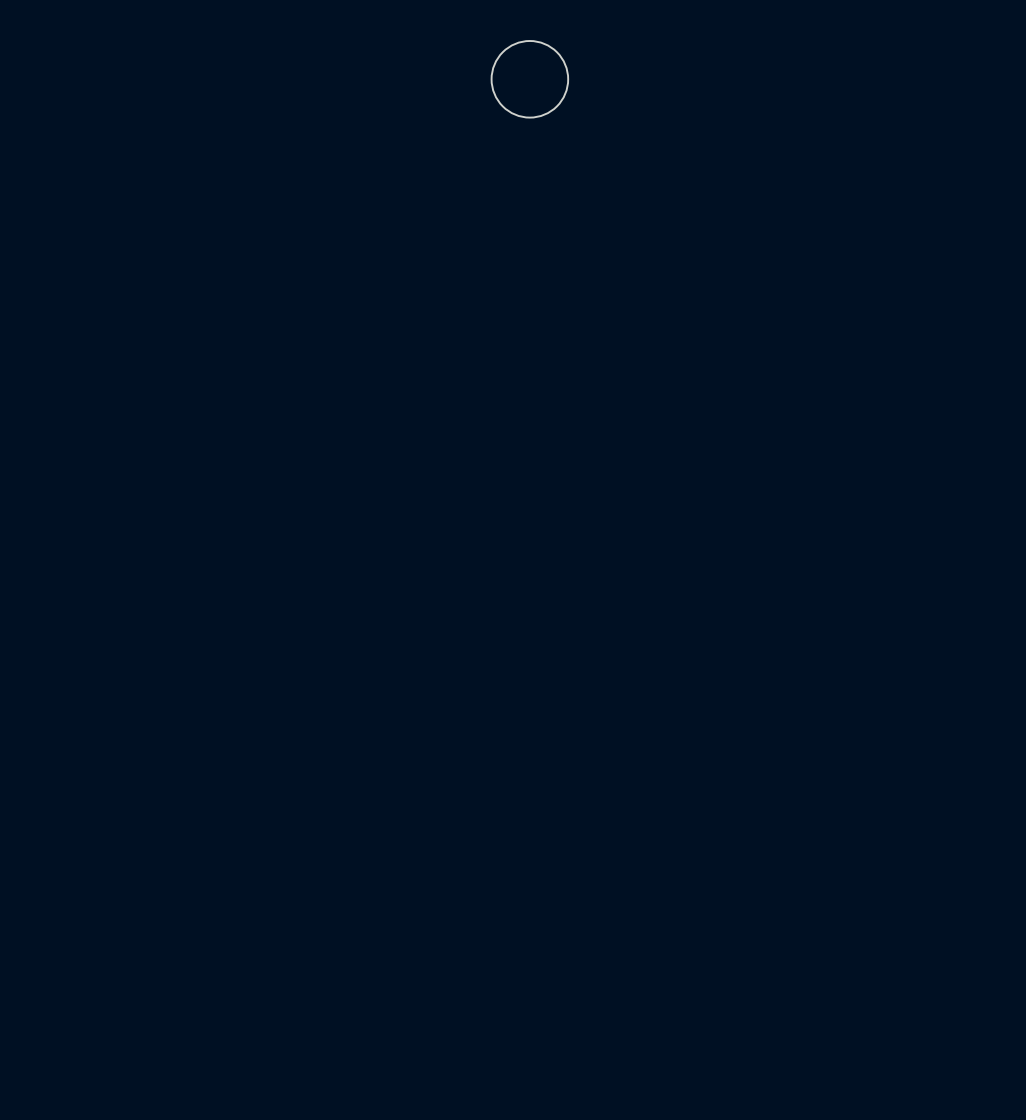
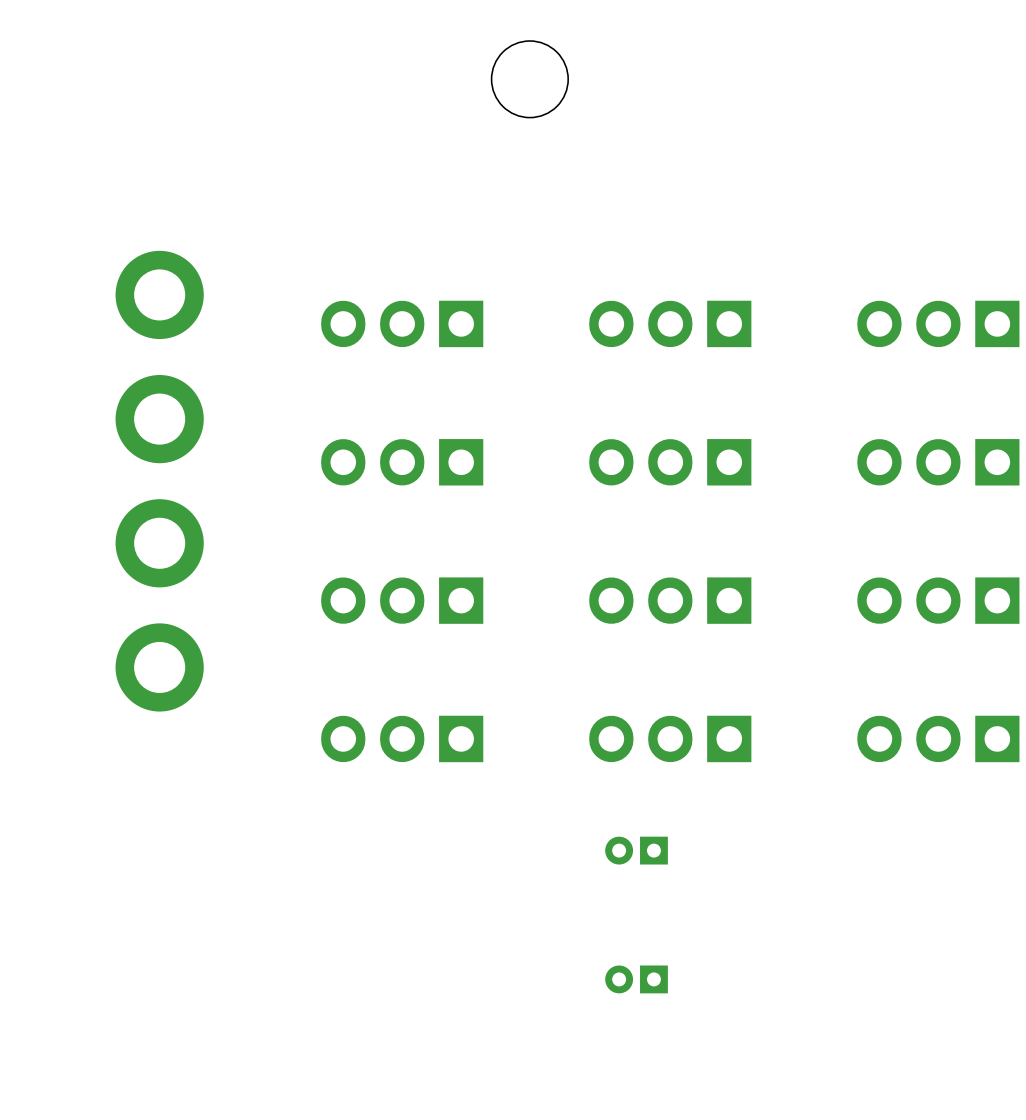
part: none -> (159, 294)
part: none -> (402, 323)
part: none -> (670, 323)
part: none -> (938, 323)
part: none -> (159, 419)
part: none -> (402, 462)
part: none -> (670, 462)
part: none -> (938, 462)
part: none -> (159, 543)
part: none -> (402, 600)
part: none -> (670, 600)
part: none -> (938, 600)
part: none -> (159, 667)
part: none -> (402, 738)
part: none -> (670, 738)
part: none -> (938, 738)
part: none -> (636, 850)
part: none -> (636, 979)

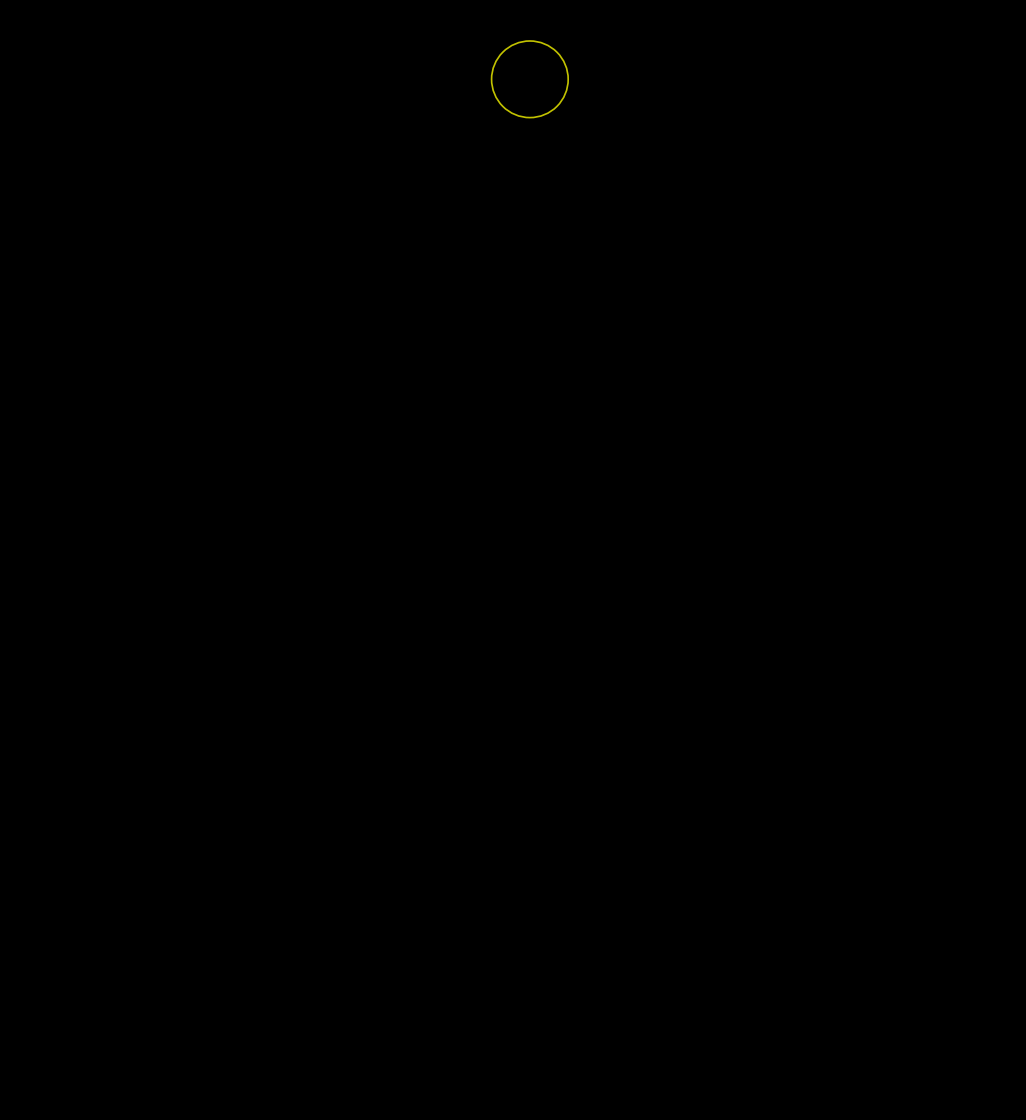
part: (159, 294) -> none
part: (402, 323) -> none
part: (670, 323) -> none
part: (938, 323) -> none
part: (159, 419) -> none
part: (402, 462) -> none
part: (670, 462) -> none
part: (938, 462) -> none
part: (159, 543) -> none
part: (402, 600) -> none
part: (670, 600) -> none
part: (938, 600) -> none
part: (159, 667) -> none
part: (402, 738) -> none
part: (670, 738) -> none
part: (938, 738) -> none
part: (636, 850) -> none
part: (636, 979) -> none

